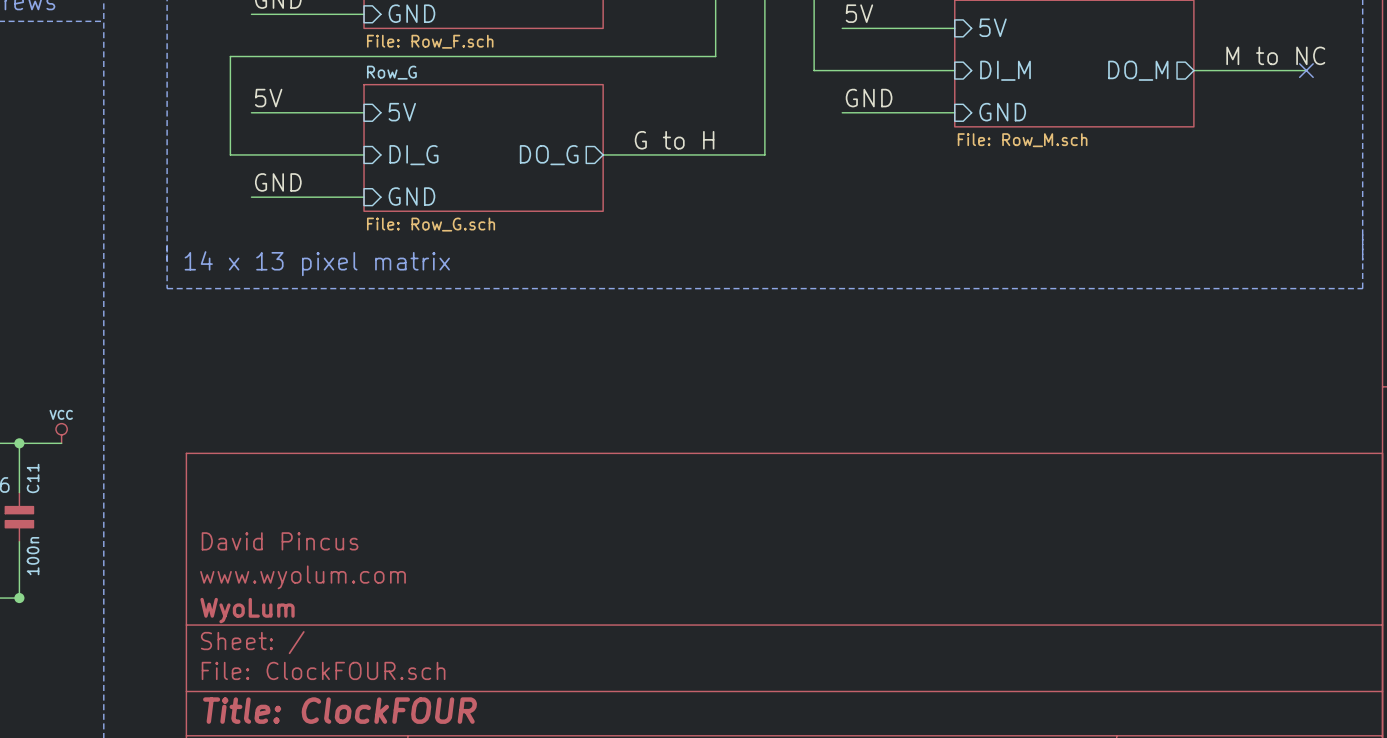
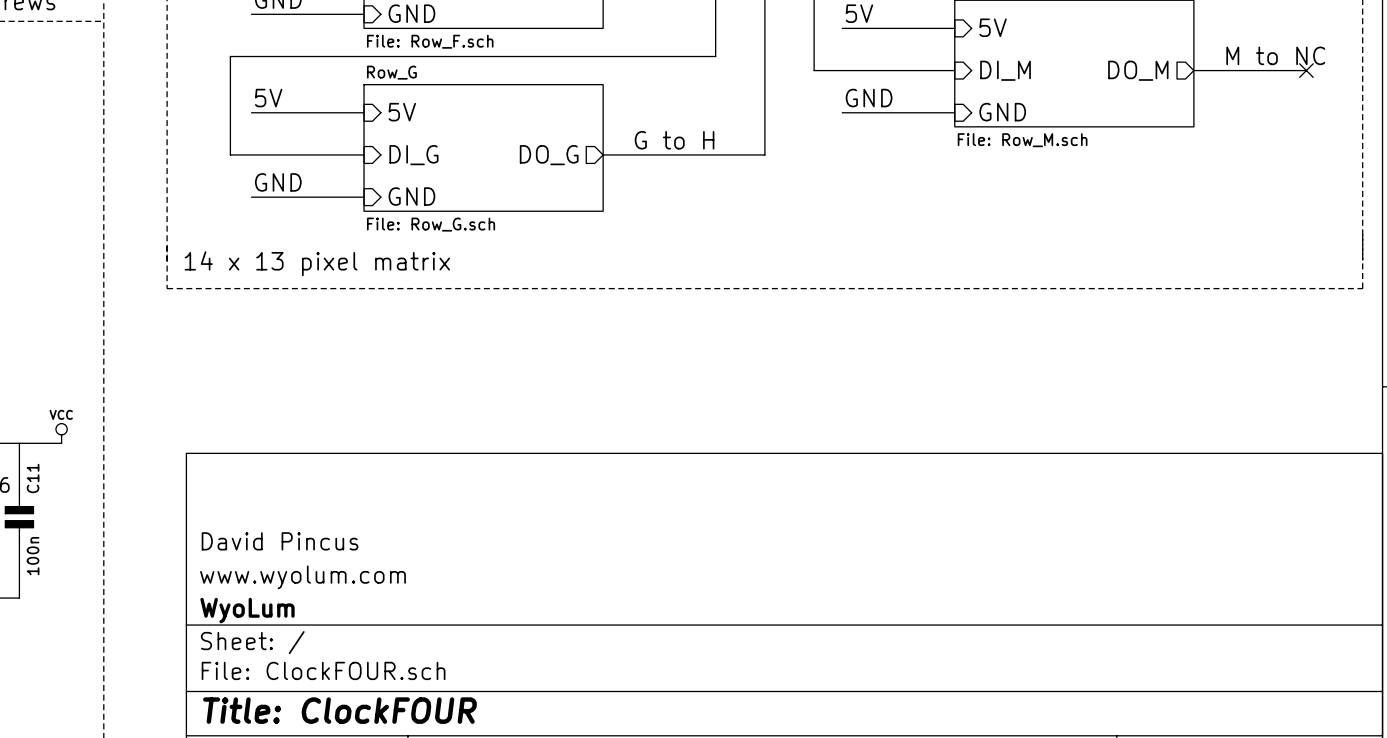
junction: (19, 443) -> none
junction: (19, 598) -> none

